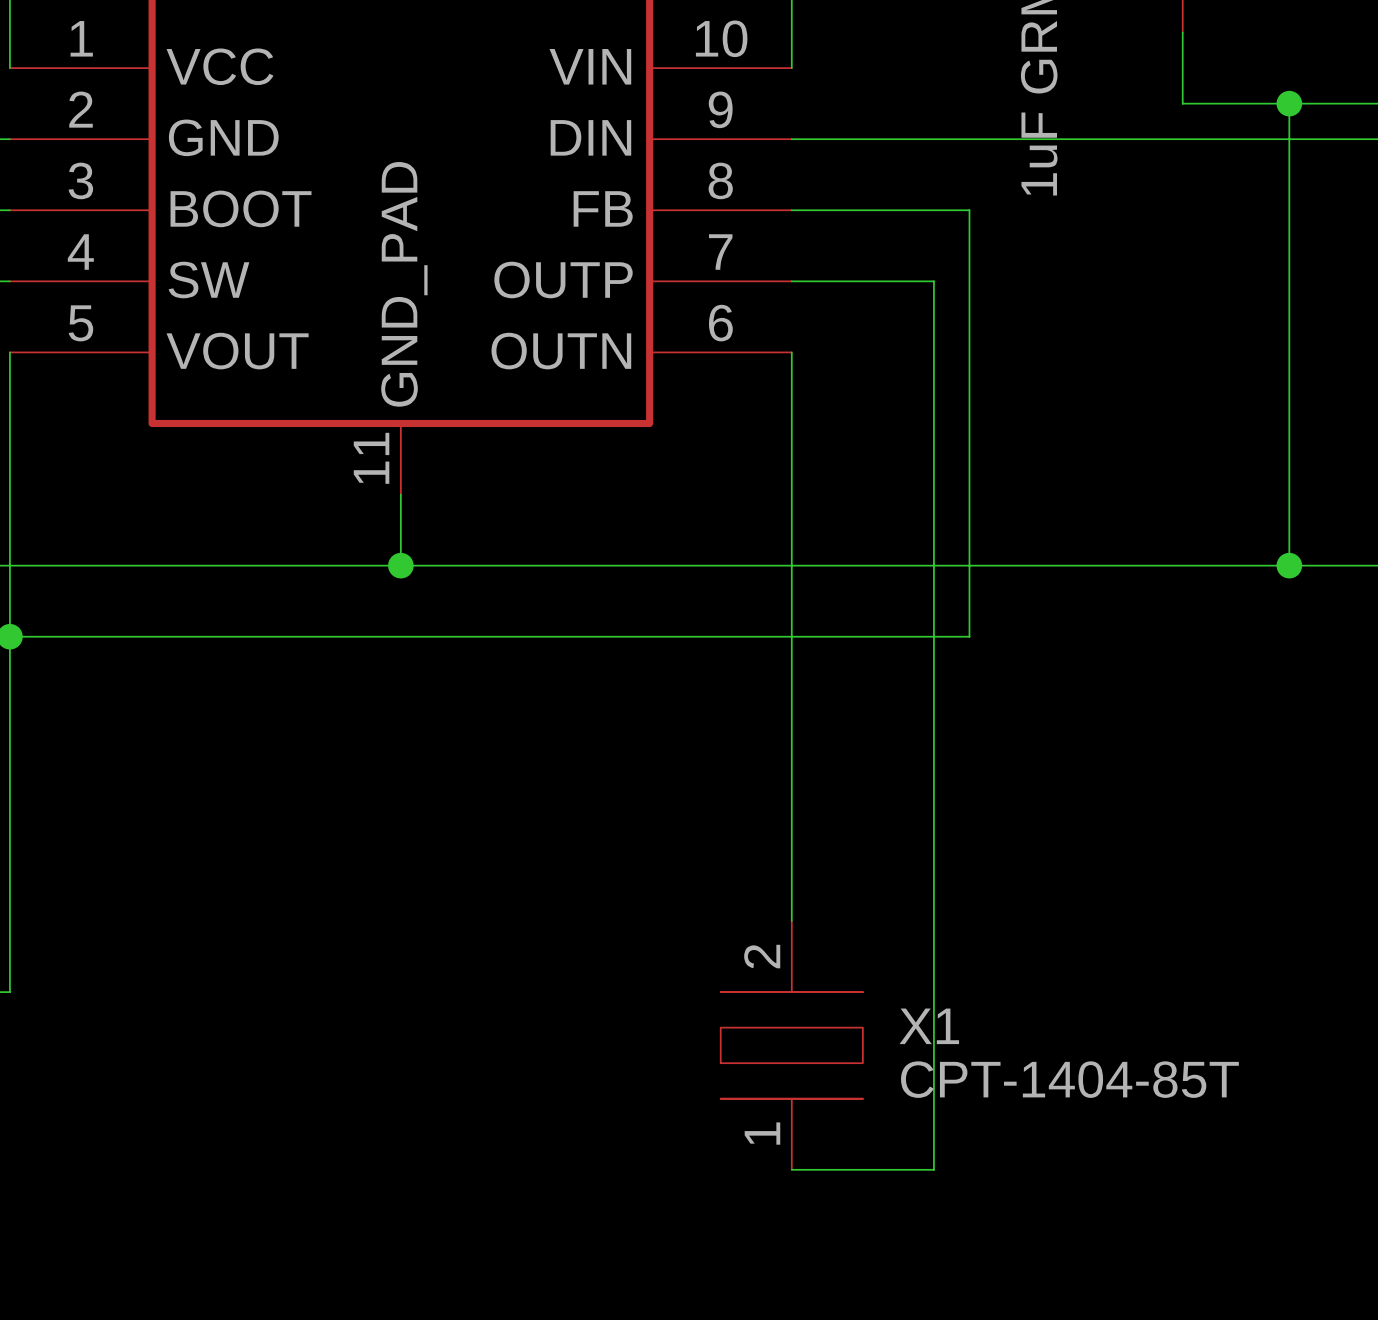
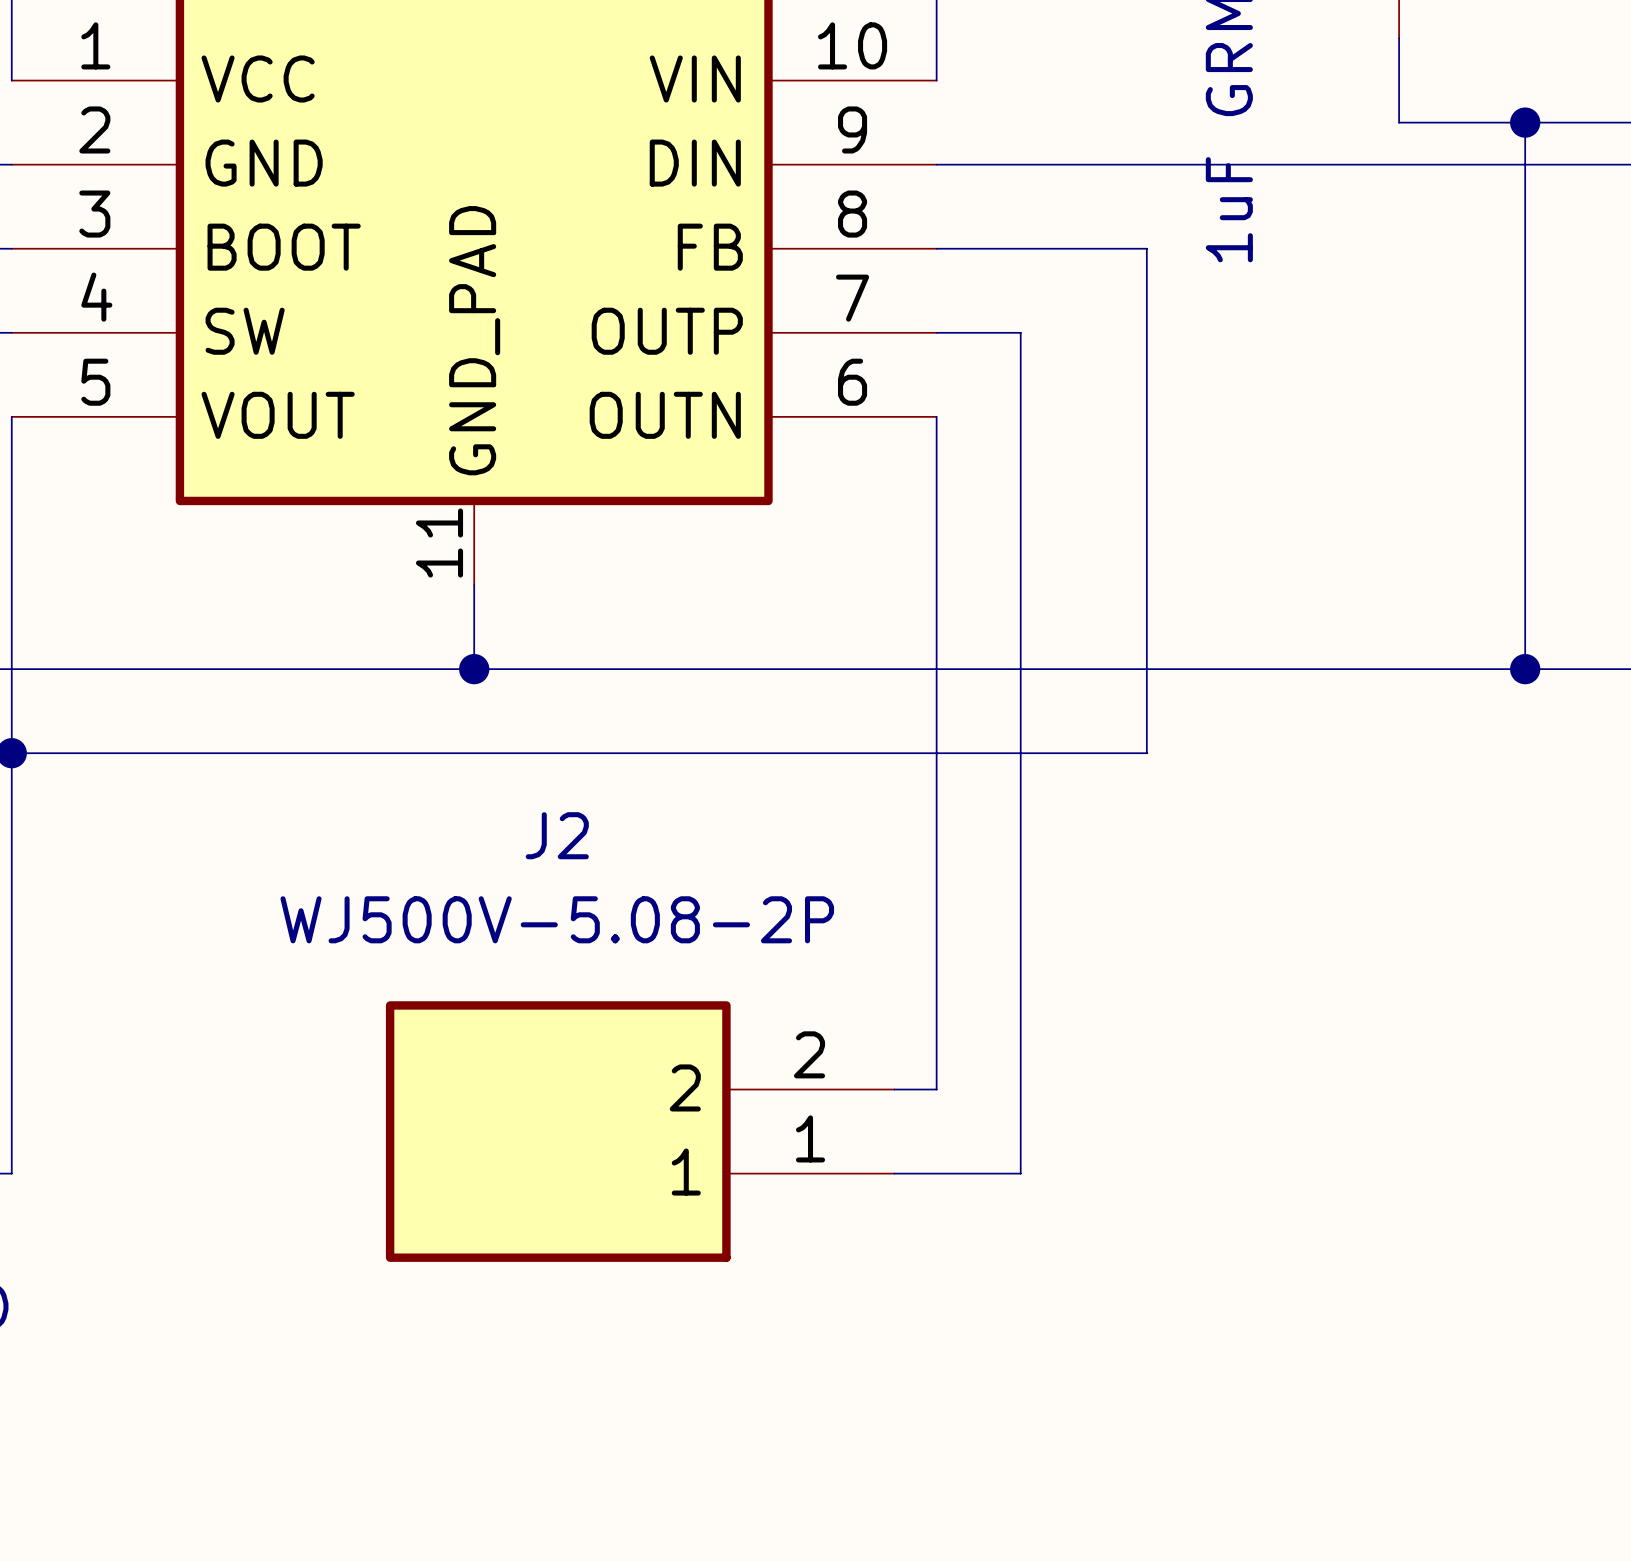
wire: (862, 281) (933, 281) (933, 1169) (791, 1169) -> (1020, 332) (1020, 1173) (894, 1173)
wire: none -> (894, 1089) (936, 1089)
J2: none -> WJ500V-5.08-2P (640, 1131)
X1: CPT-1404-85T (791, 1045) -> none

